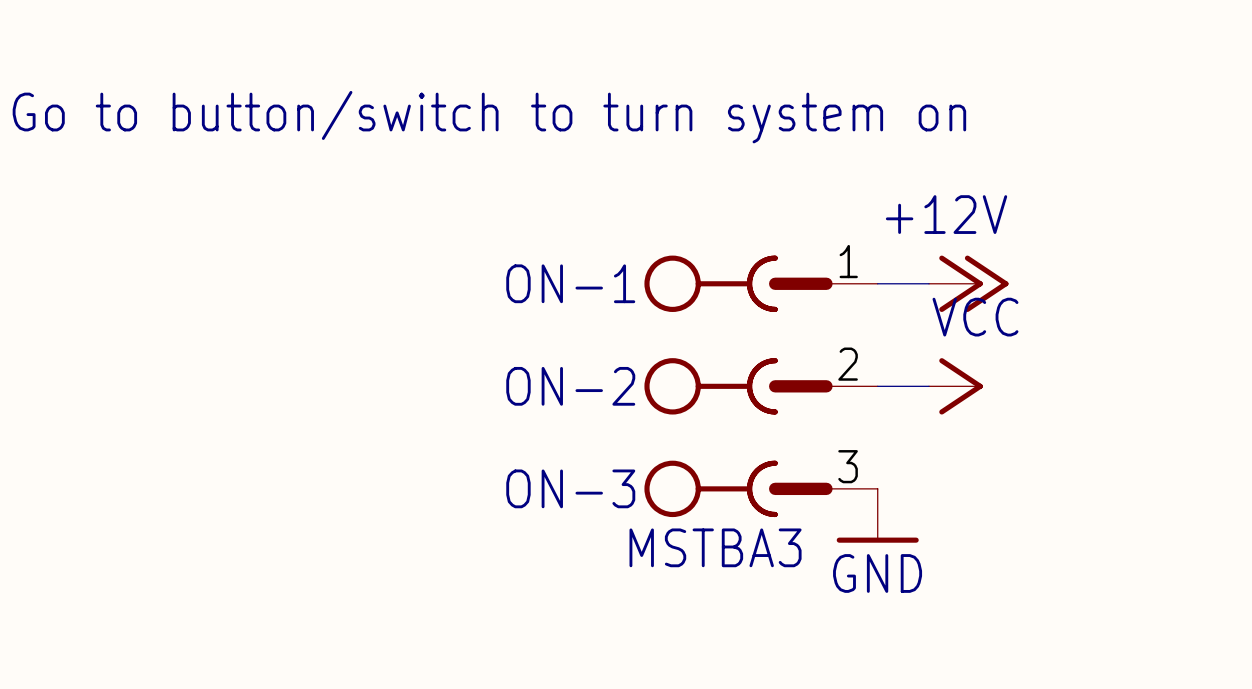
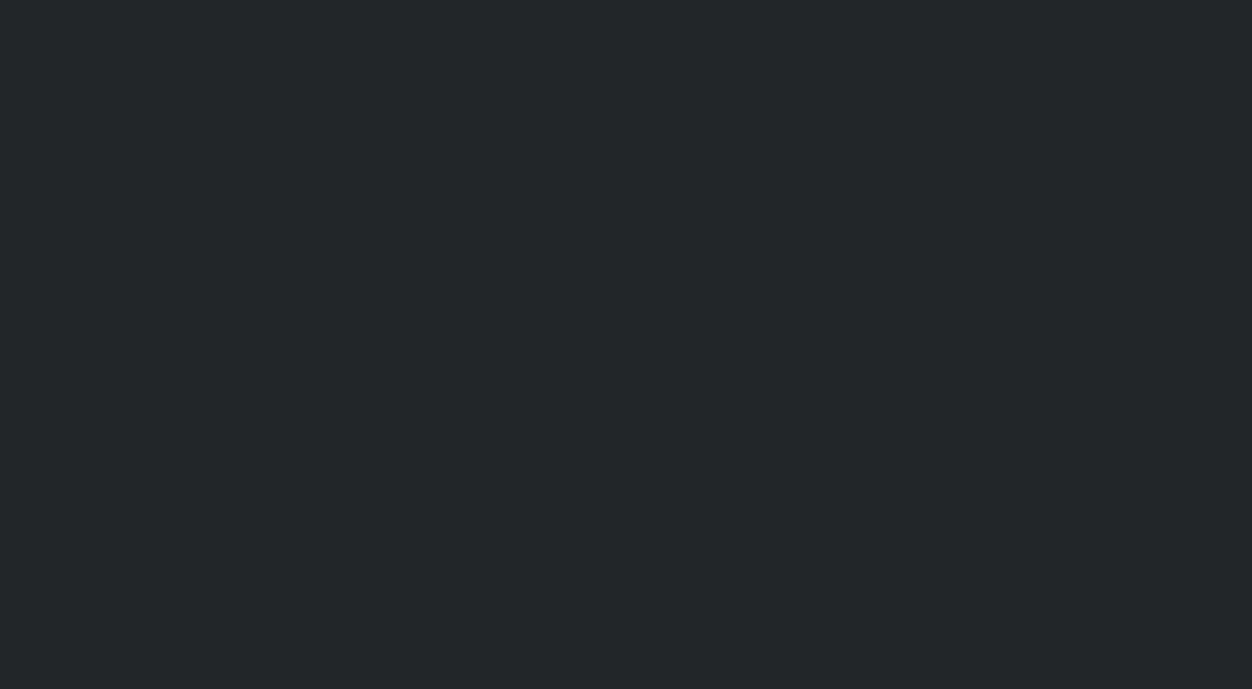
text: Go to button/switch to turn system on (489, 117) -> none
ON-1: (761, 283) -> none
wire: (877, 283) (928, 283) -> none
power symbol: +12V (968, 283) -> none
ON-2: (761, 386) -> none
wire: (877, 386) (928, 386) -> none
power symbol: VCC (955, 386) -> none
ON-3: MSTBA3 (761, 488) -> none
power symbol: GND (877, 515) -> none

